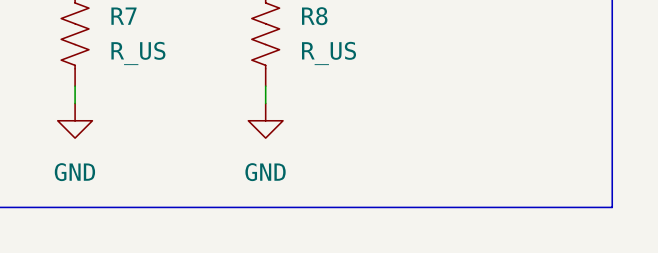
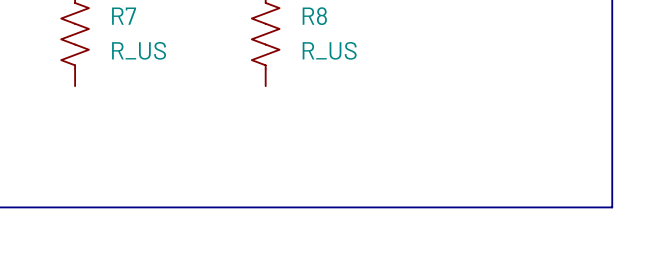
wire: (75, 86) (75, 103) -> none
wire: (265, 86) (265, 103) -> none
power symbol: GND (75, 120) -> none
power symbol: GND (265, 120) -> none

